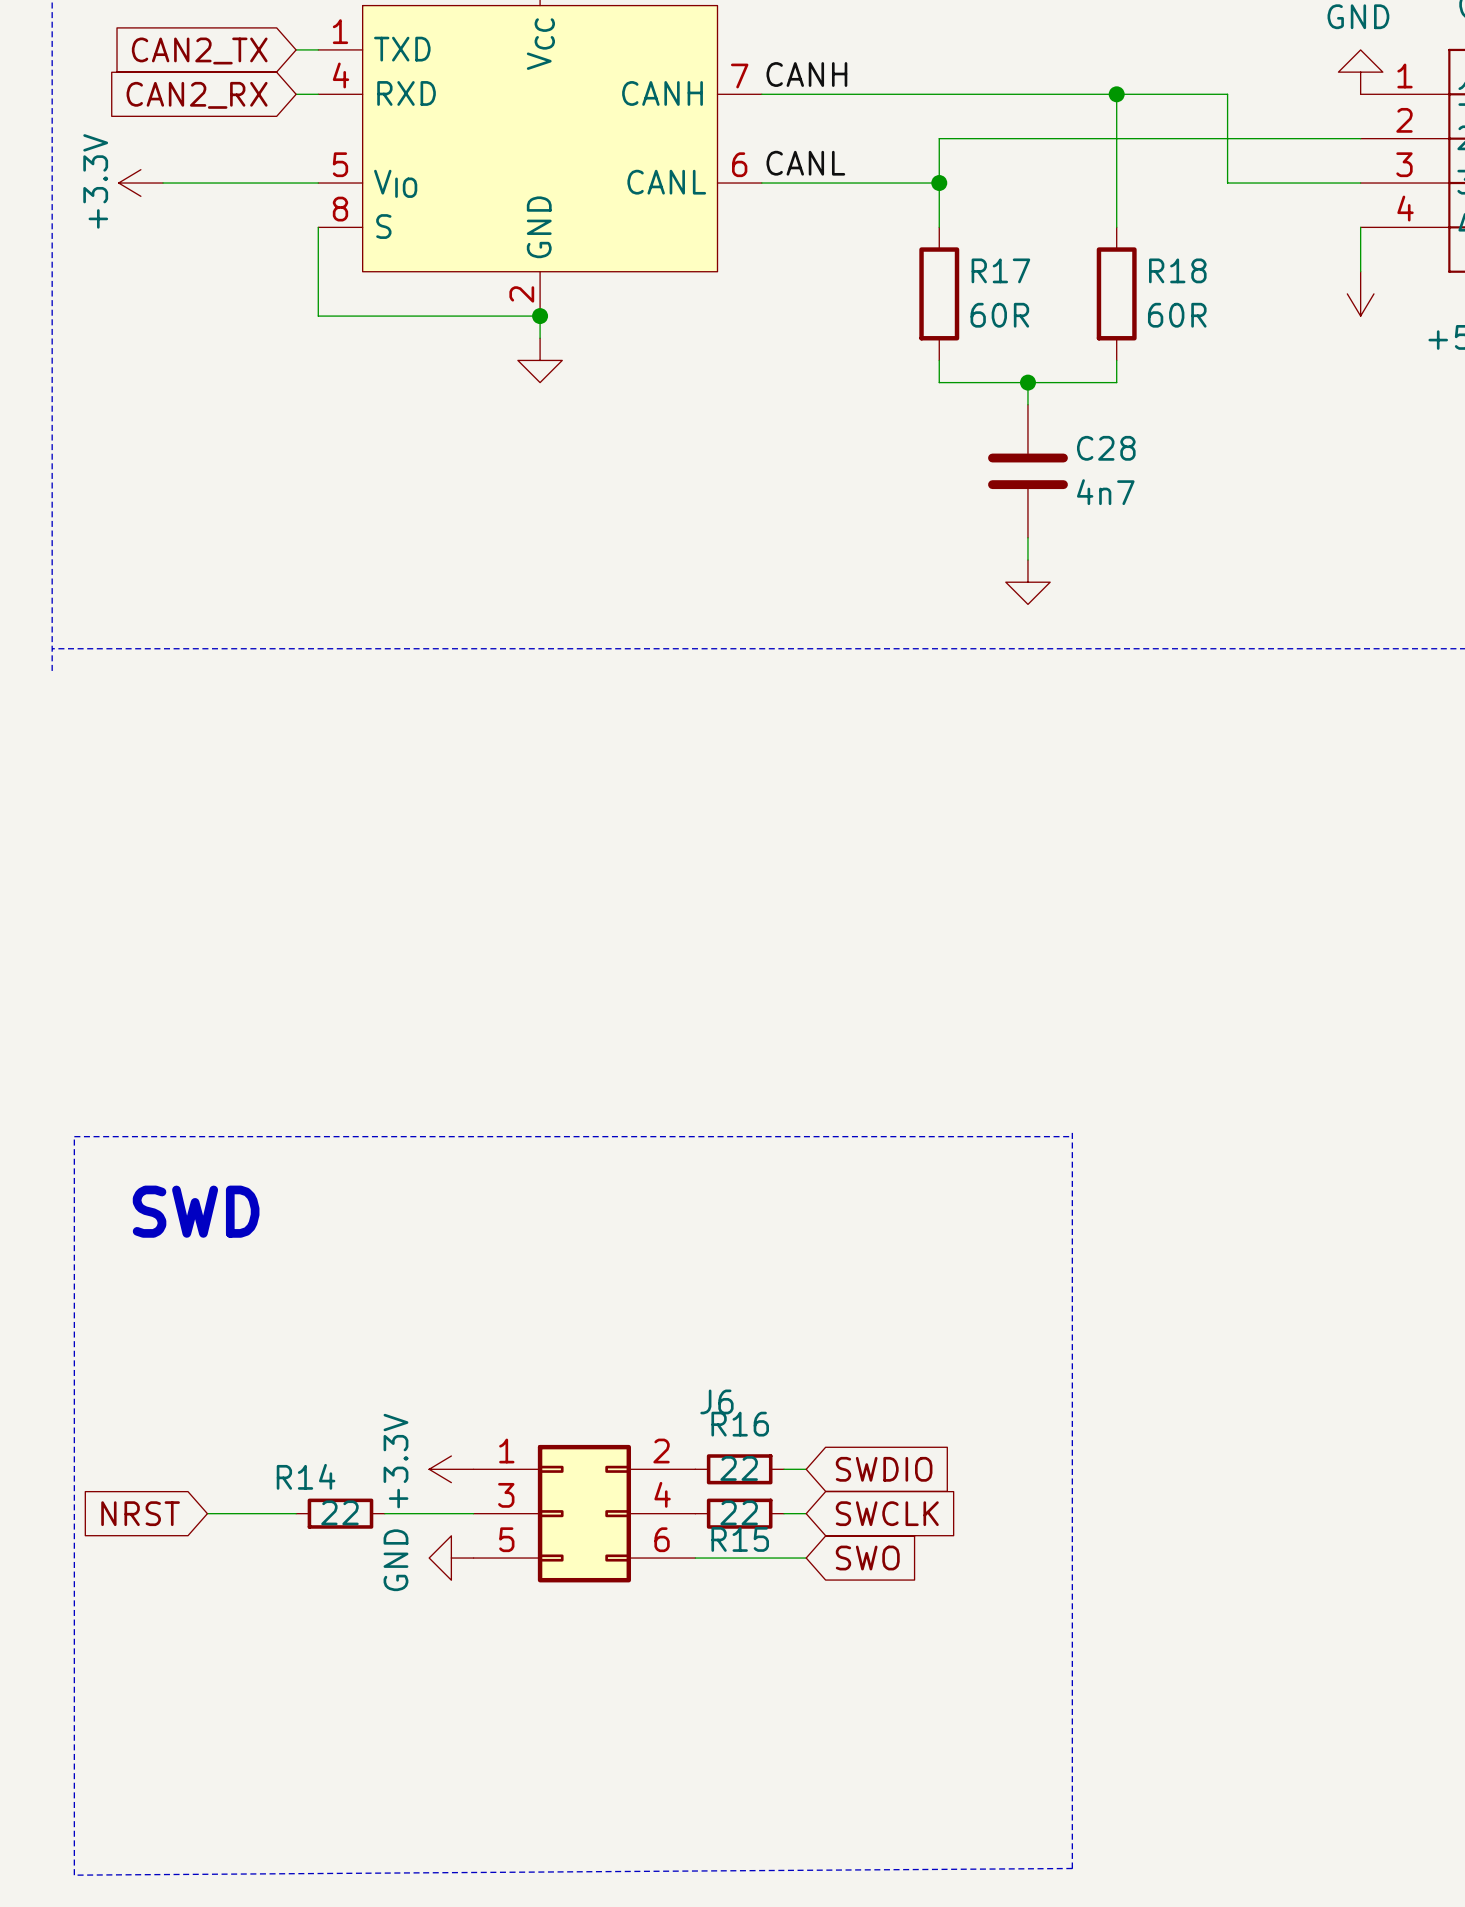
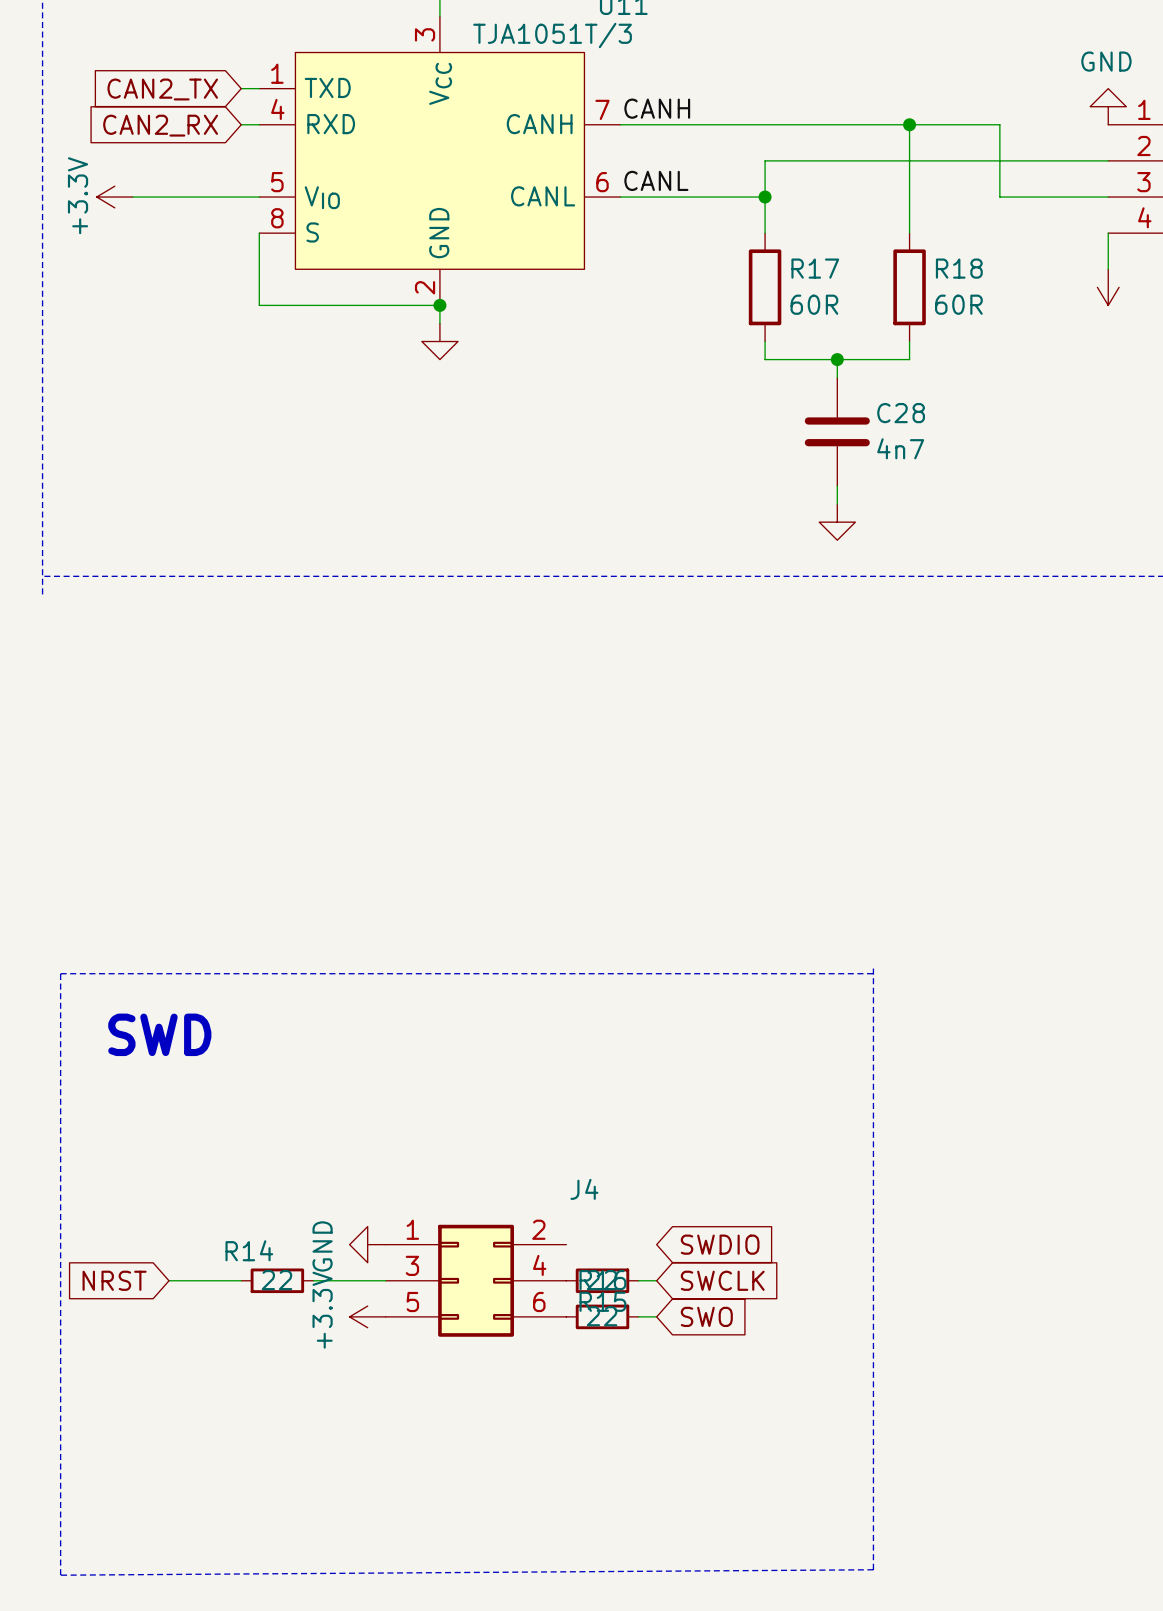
J6 name: J6 (716, 1401) -> J4 (584, 1189)
power symbol: +3.3V (451, 1469) -> GND (367, 1244)
R16 position: (739, 1469) -> (602, 1316)
wire: (784, 1469) (806, 1469) -> none
power symbol: GND (451, 1558) -> +3.3V (367, 1316)
wire: (695, 1558) (784, 1558) -> none

